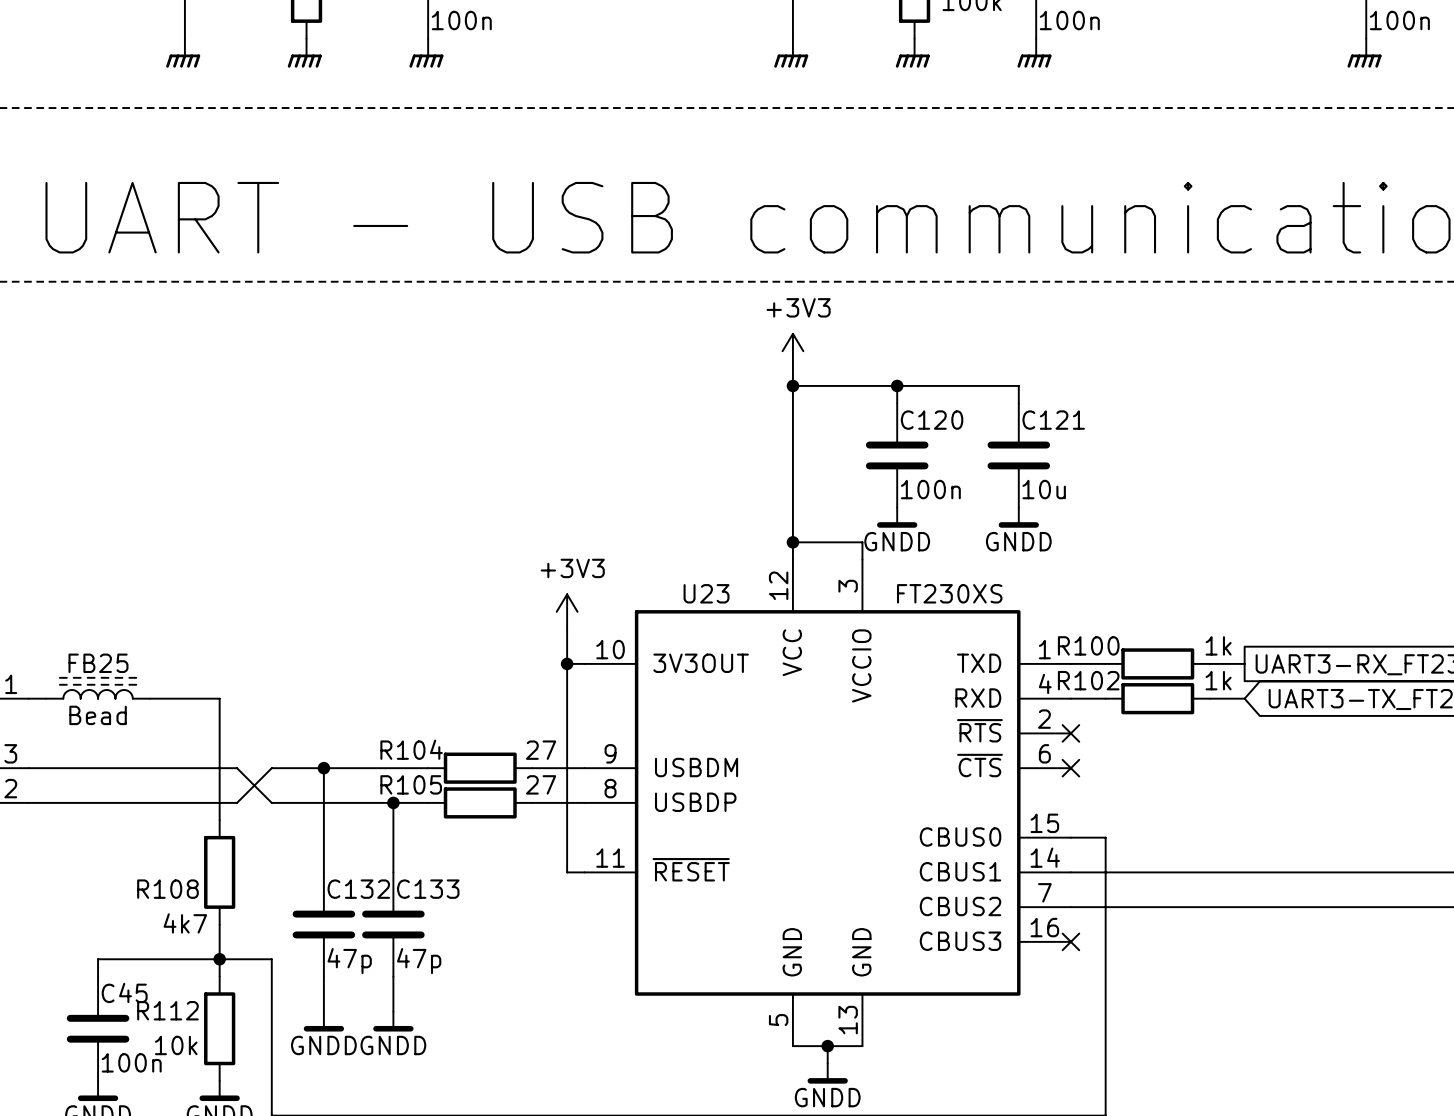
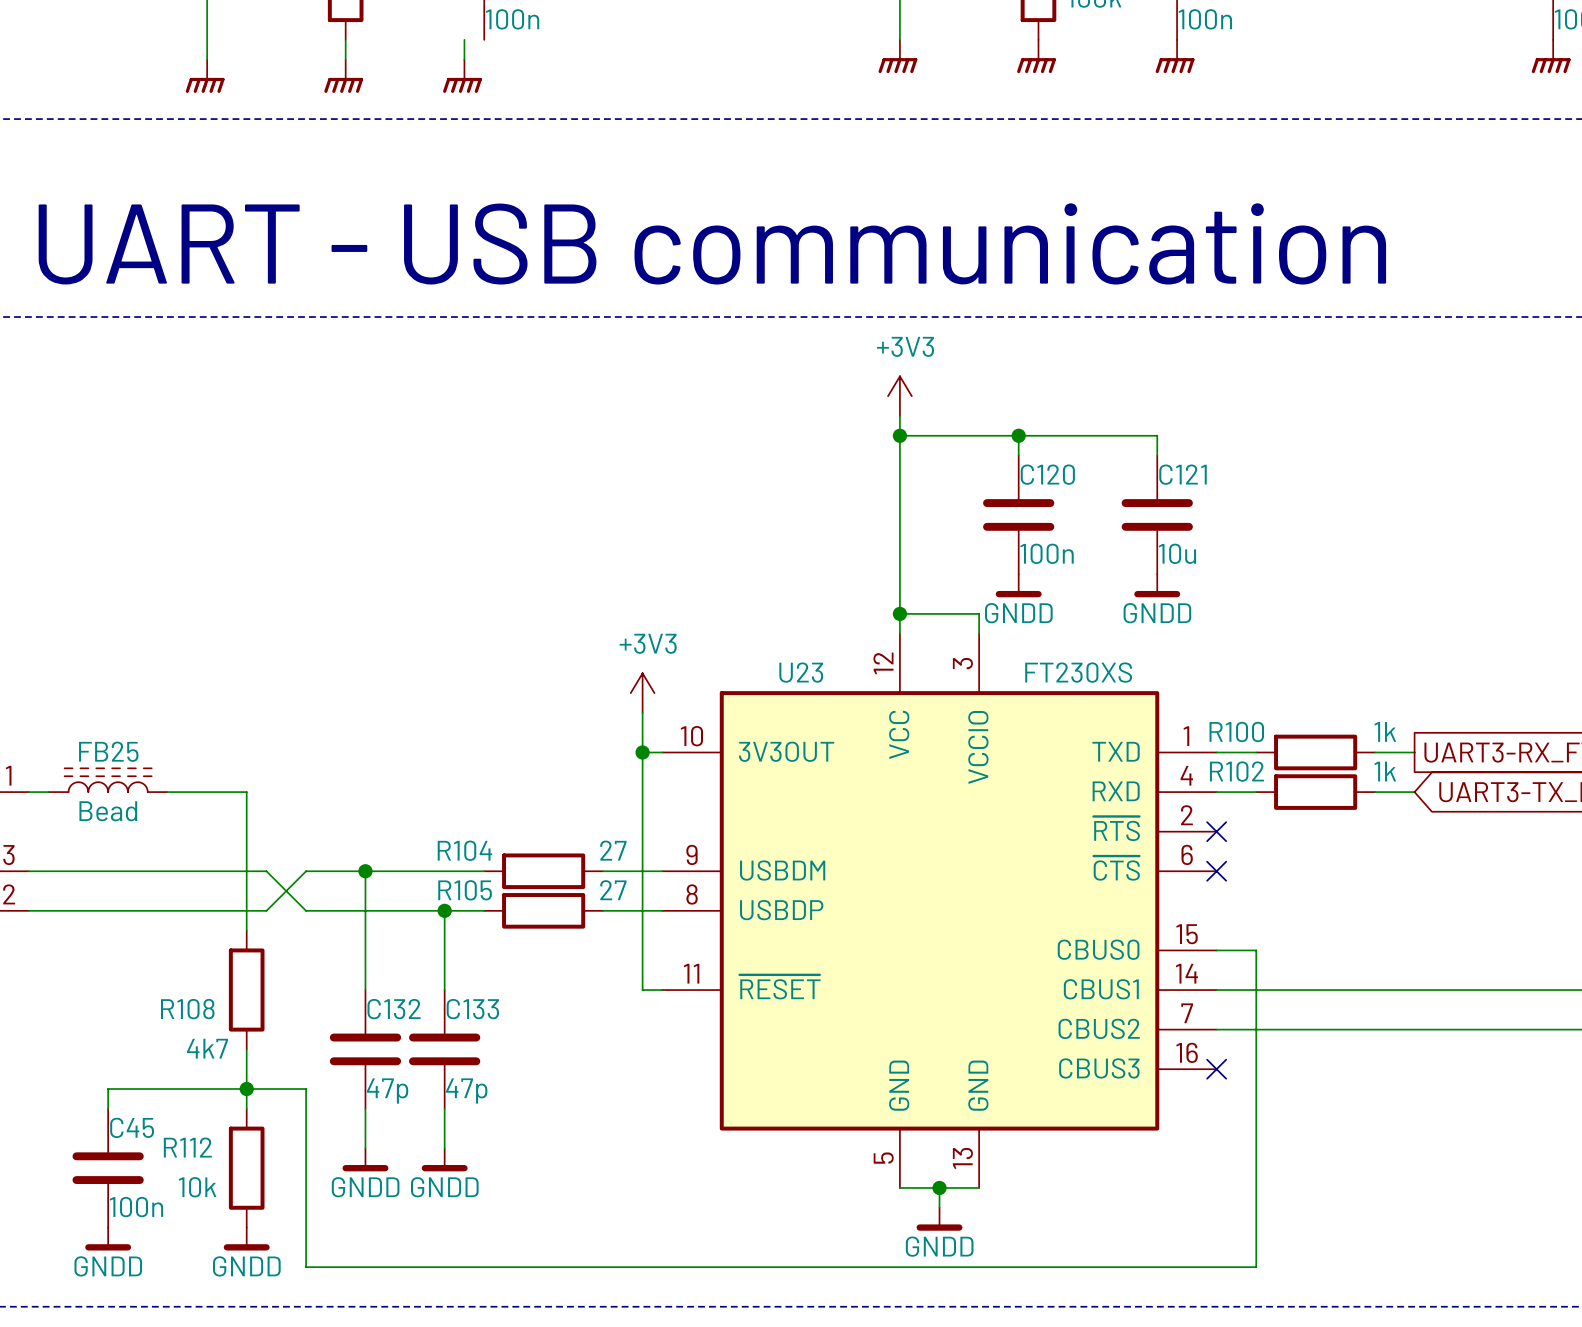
wire: none -> (464, 39) (464, 59)
power symbol position: (183, 53) -> (205, 76)
power symbol position: (304, 53) -> (343, 76)
power symbol position: (426, 53) -> (462, 76)

